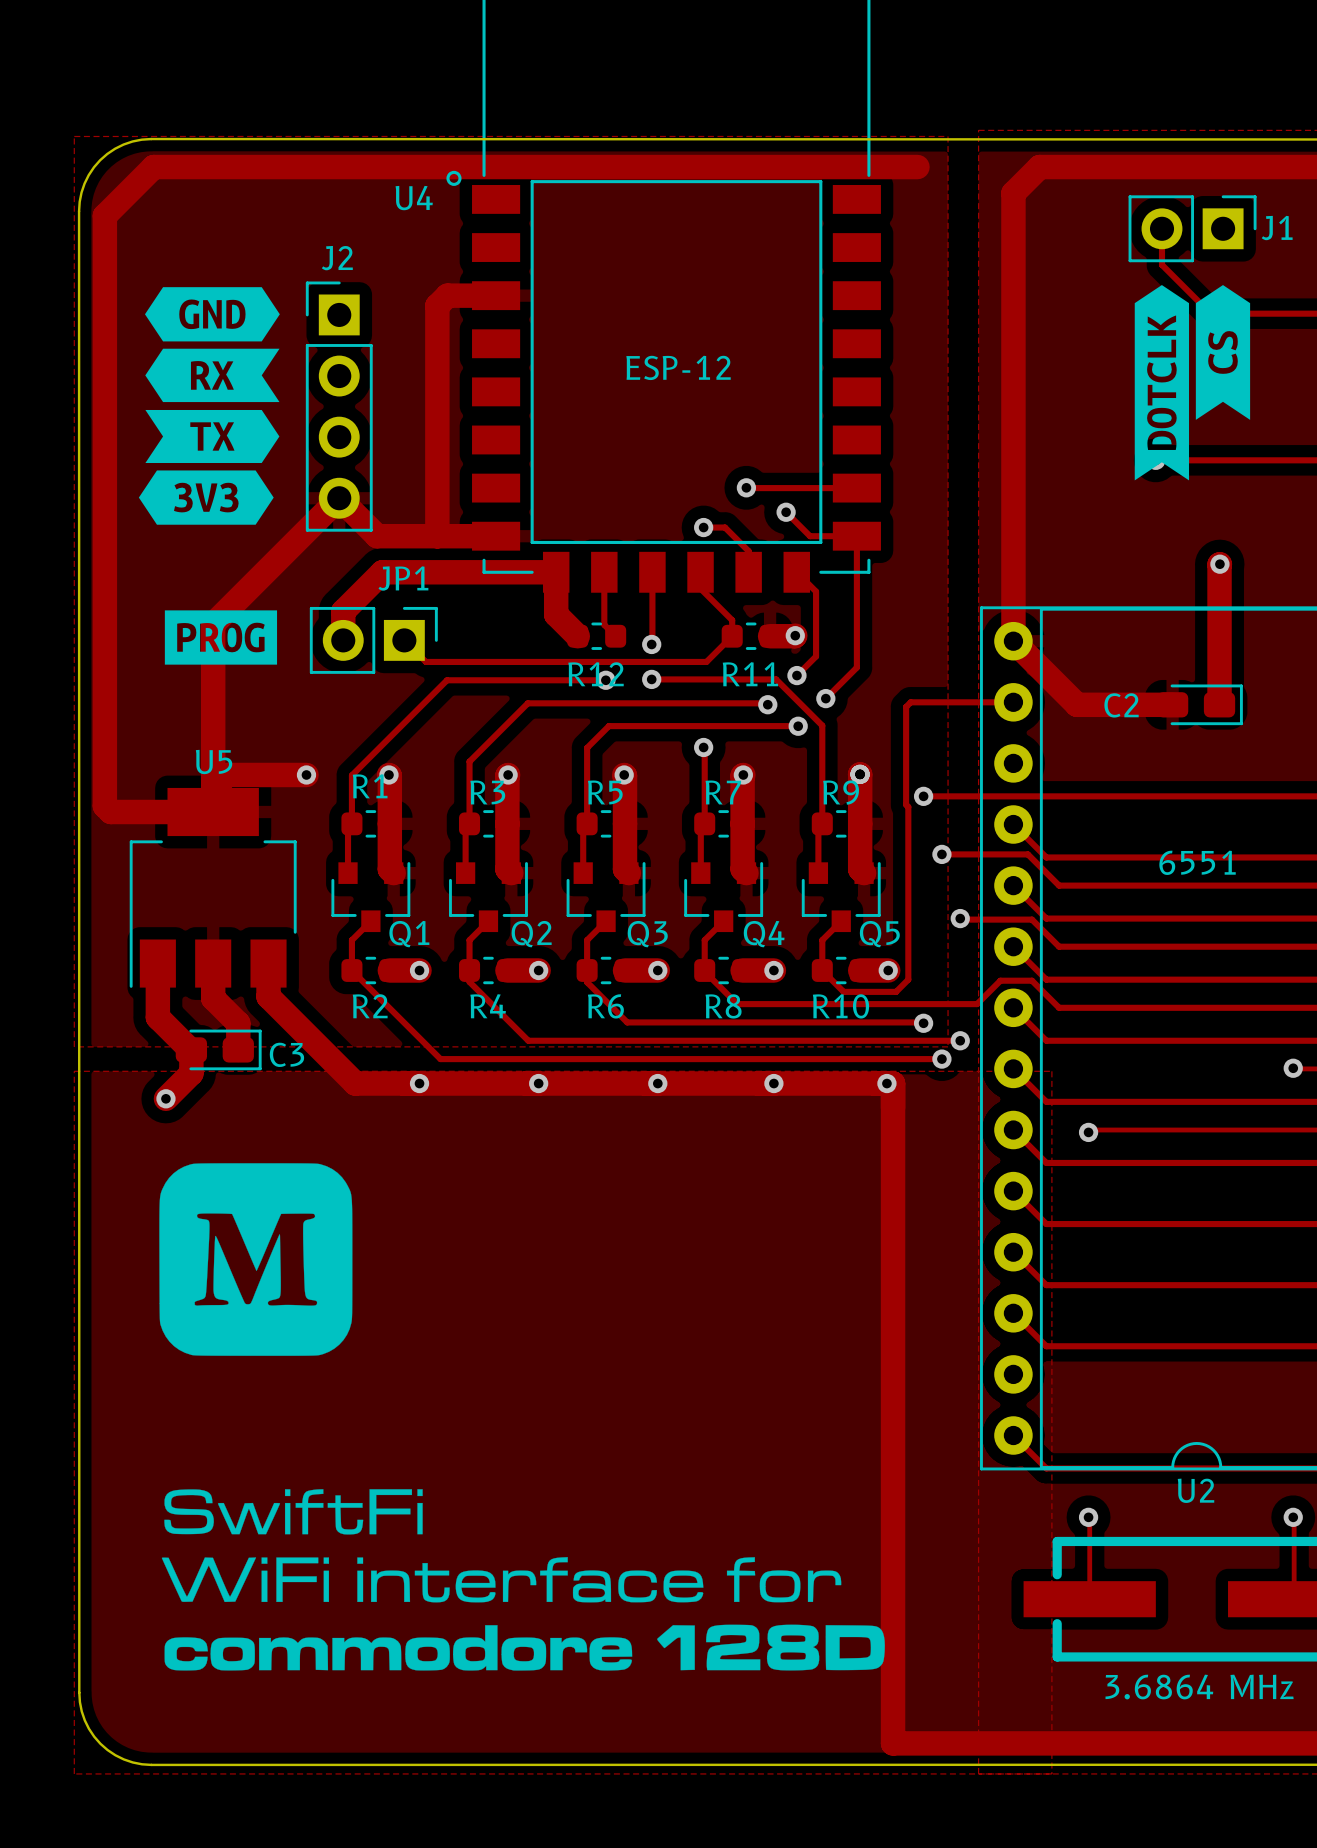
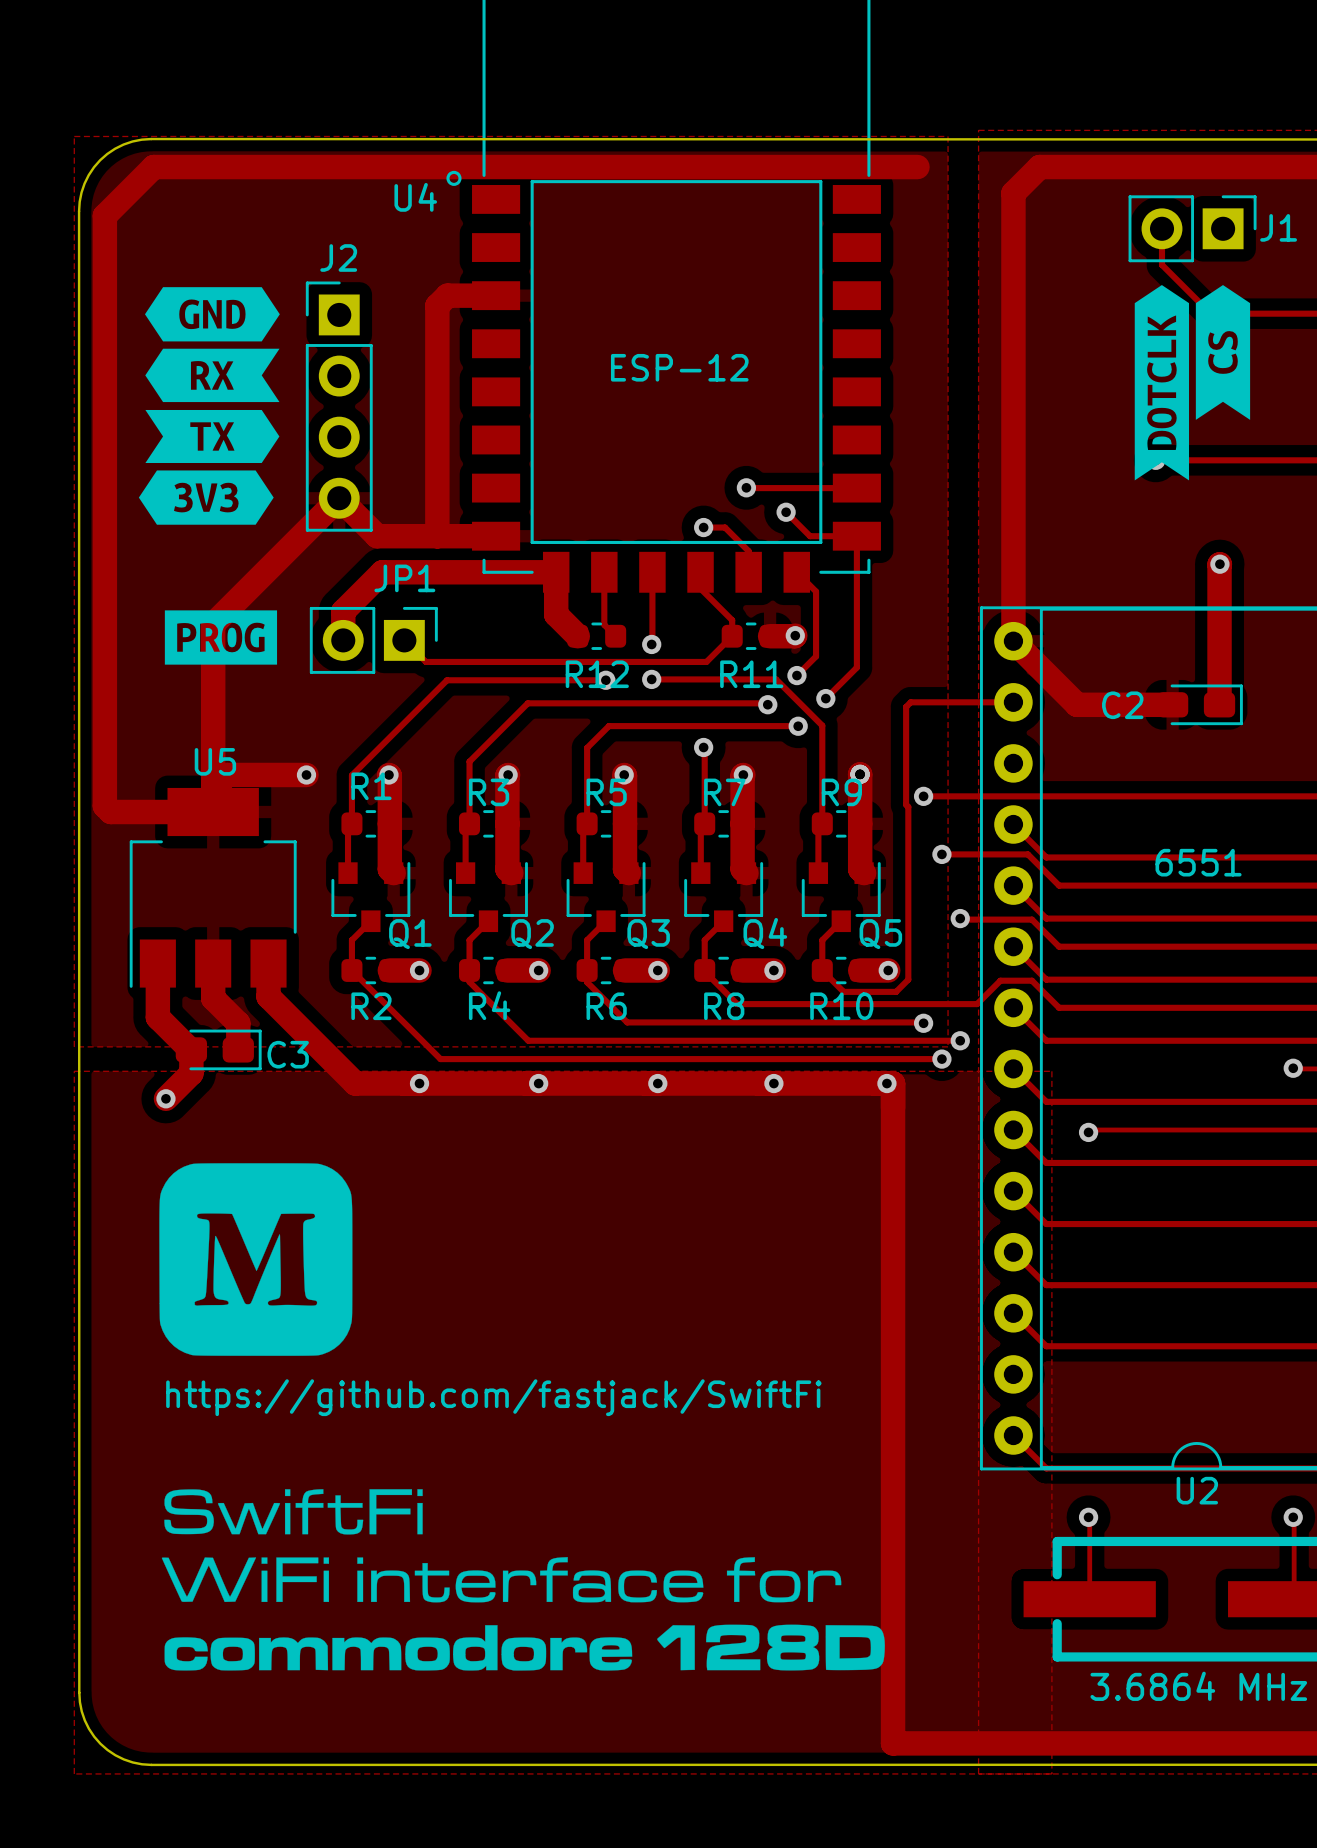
text: none -> https://github.com/fastjack/SwiftFi (493, 1397)

